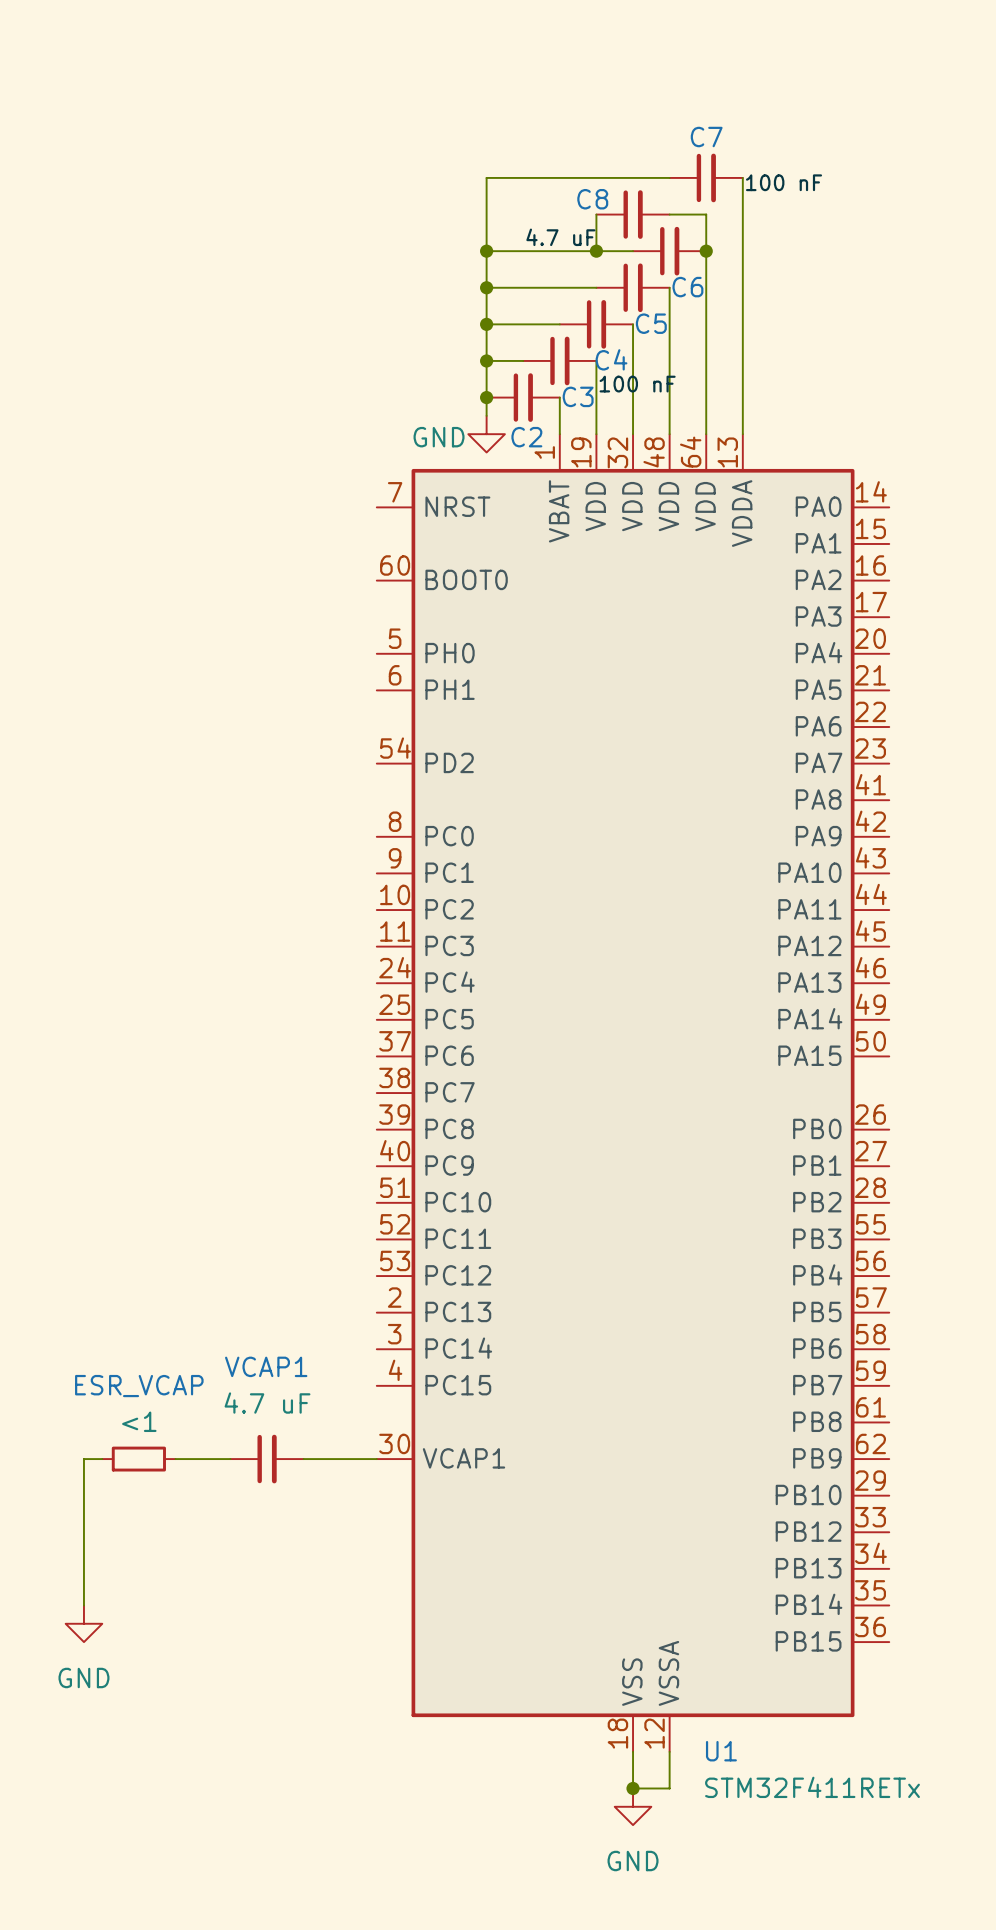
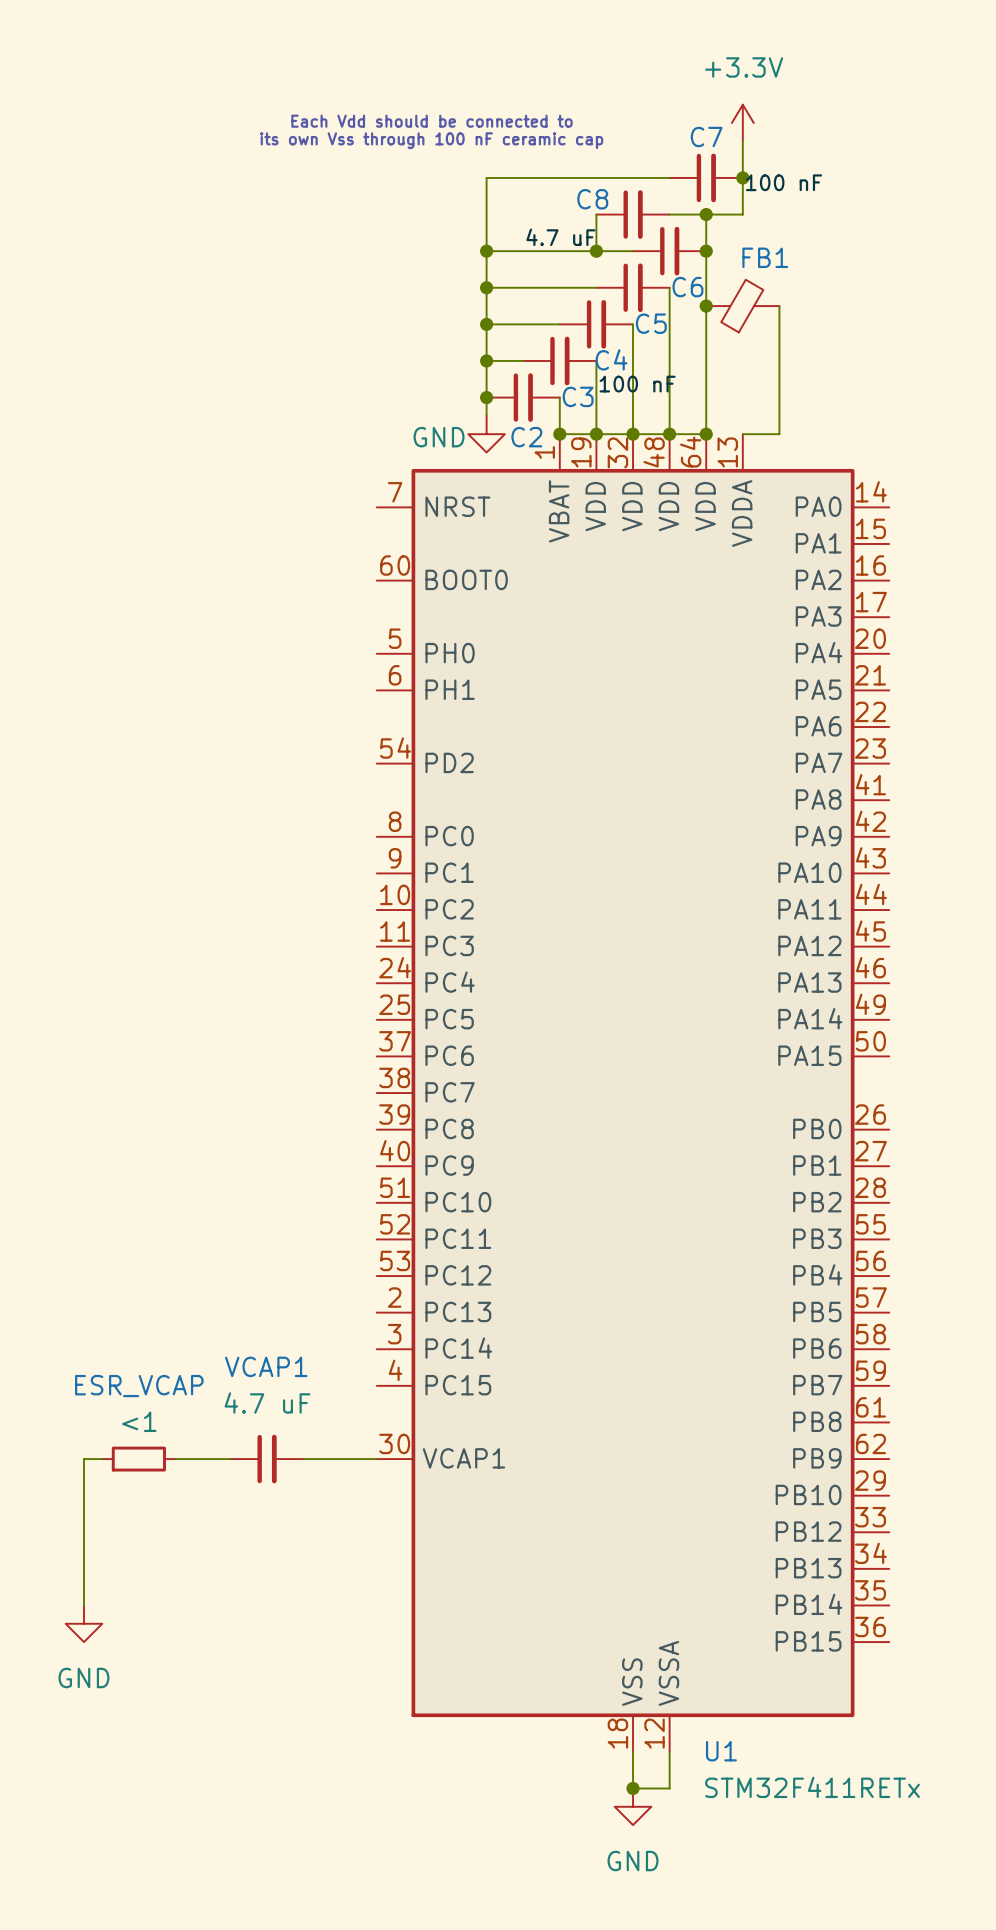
text: none -> Each Vdd should be connected to (431, 121)
power symbol: none -> +3.3V (742, 123)
text: none -> its own Vss through 100 nF ceramic cap (431, 140)
wire: none -> (742, 141) (742, 177)
junction: none -> (742, 177)
wire: none -> (706, 214) (742, 214)
junction: none -> (706, 214)
wire: (742, 214) (742, 434) -> (779, 306) (779, 434) (742, 434)
junction: none -> (706, 306)
FB1: none -> (742, 306)
wire: none -> (559, 434) (706, 434)
junction: none -> (559, 434)
junction: none -> (596, 434)
junction: none -> (633, 434)
junction: none -> (669, 434)
junction: none -> (706, 434)

